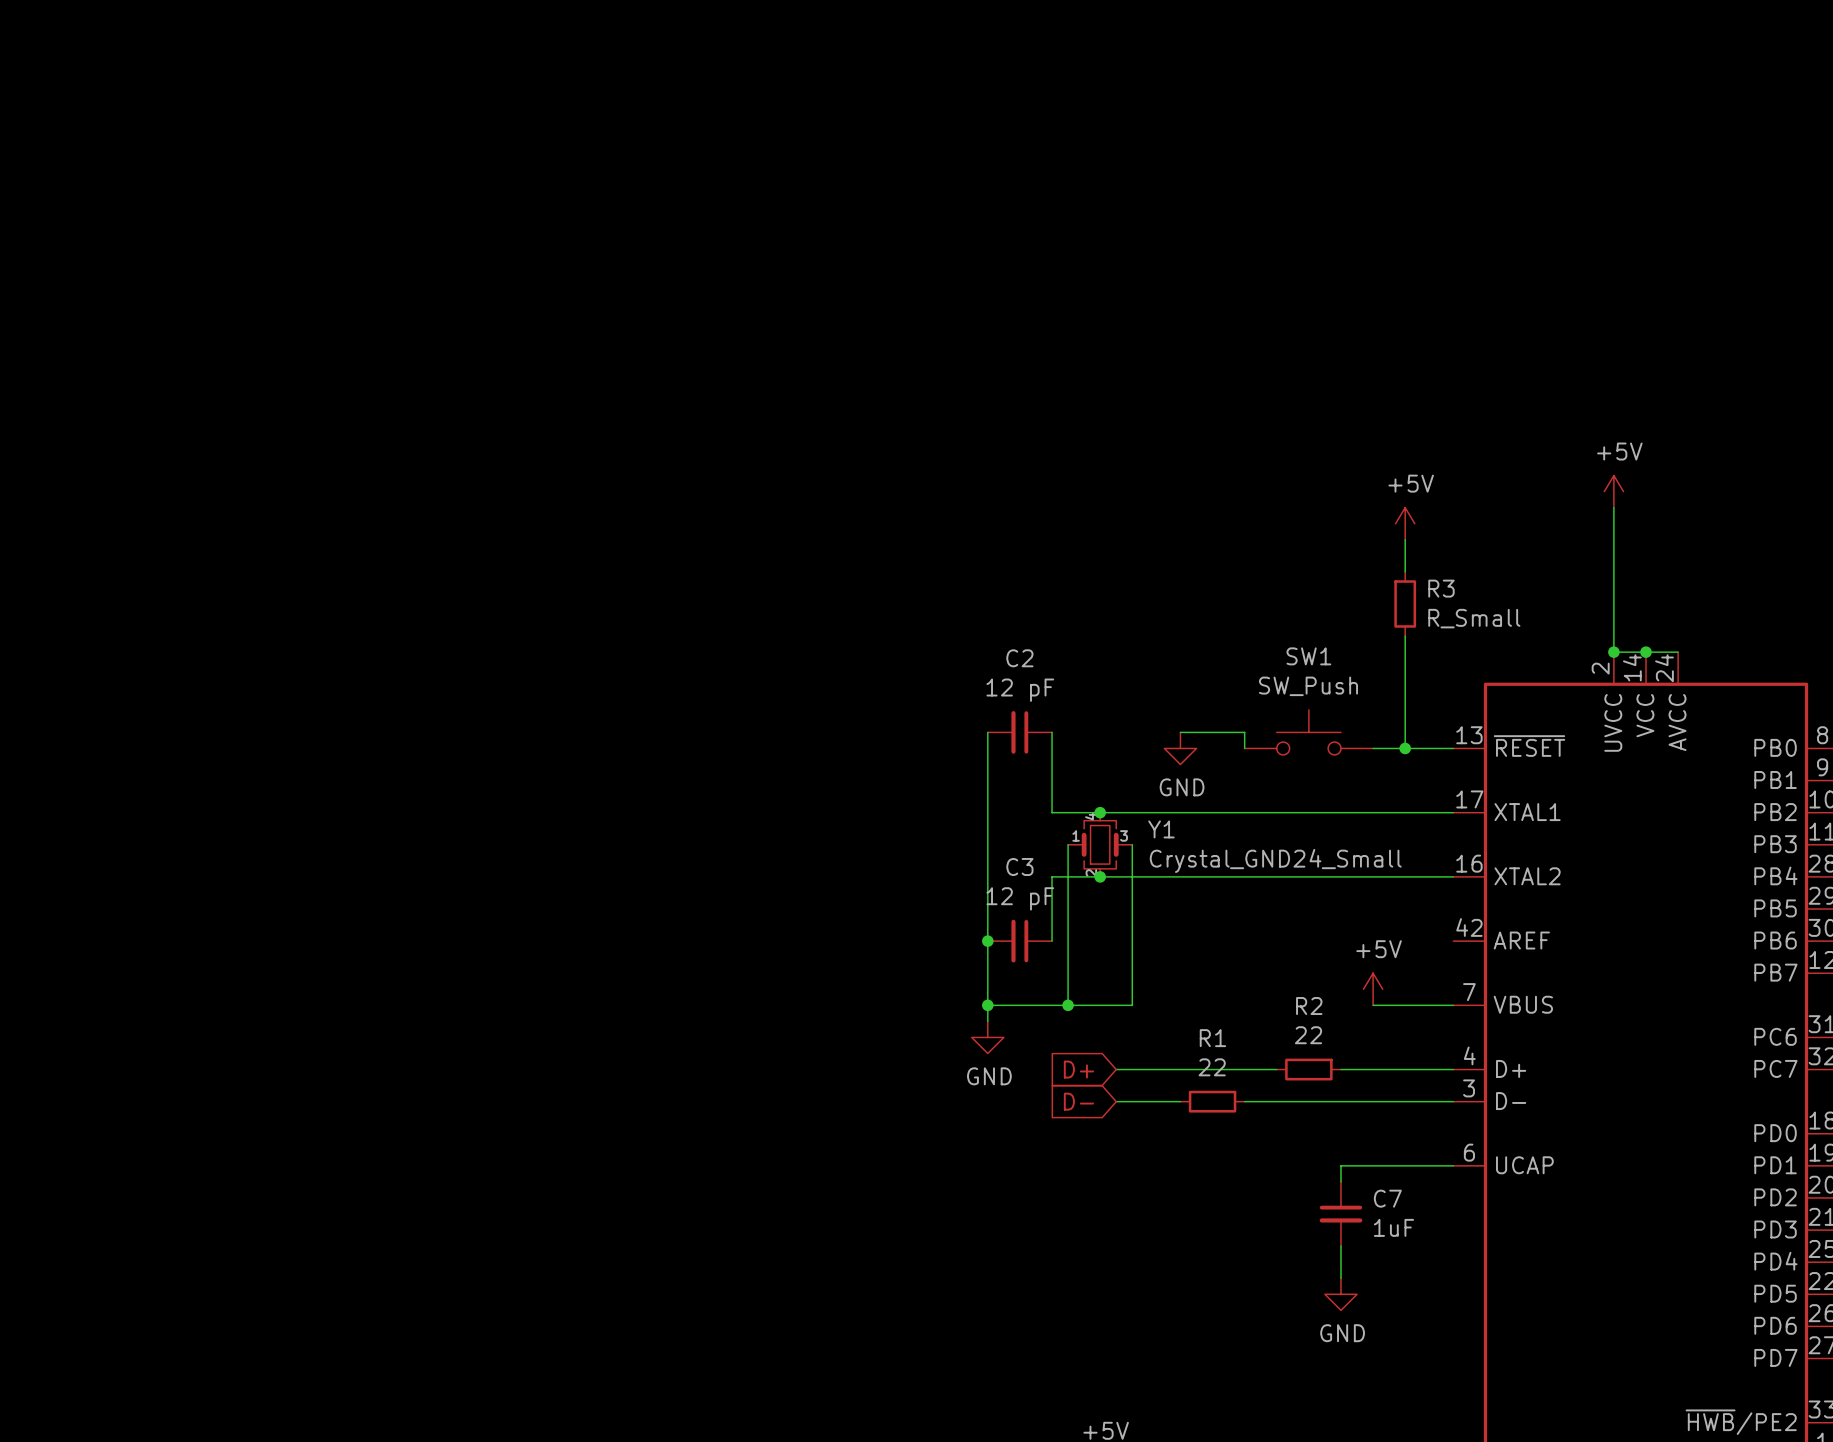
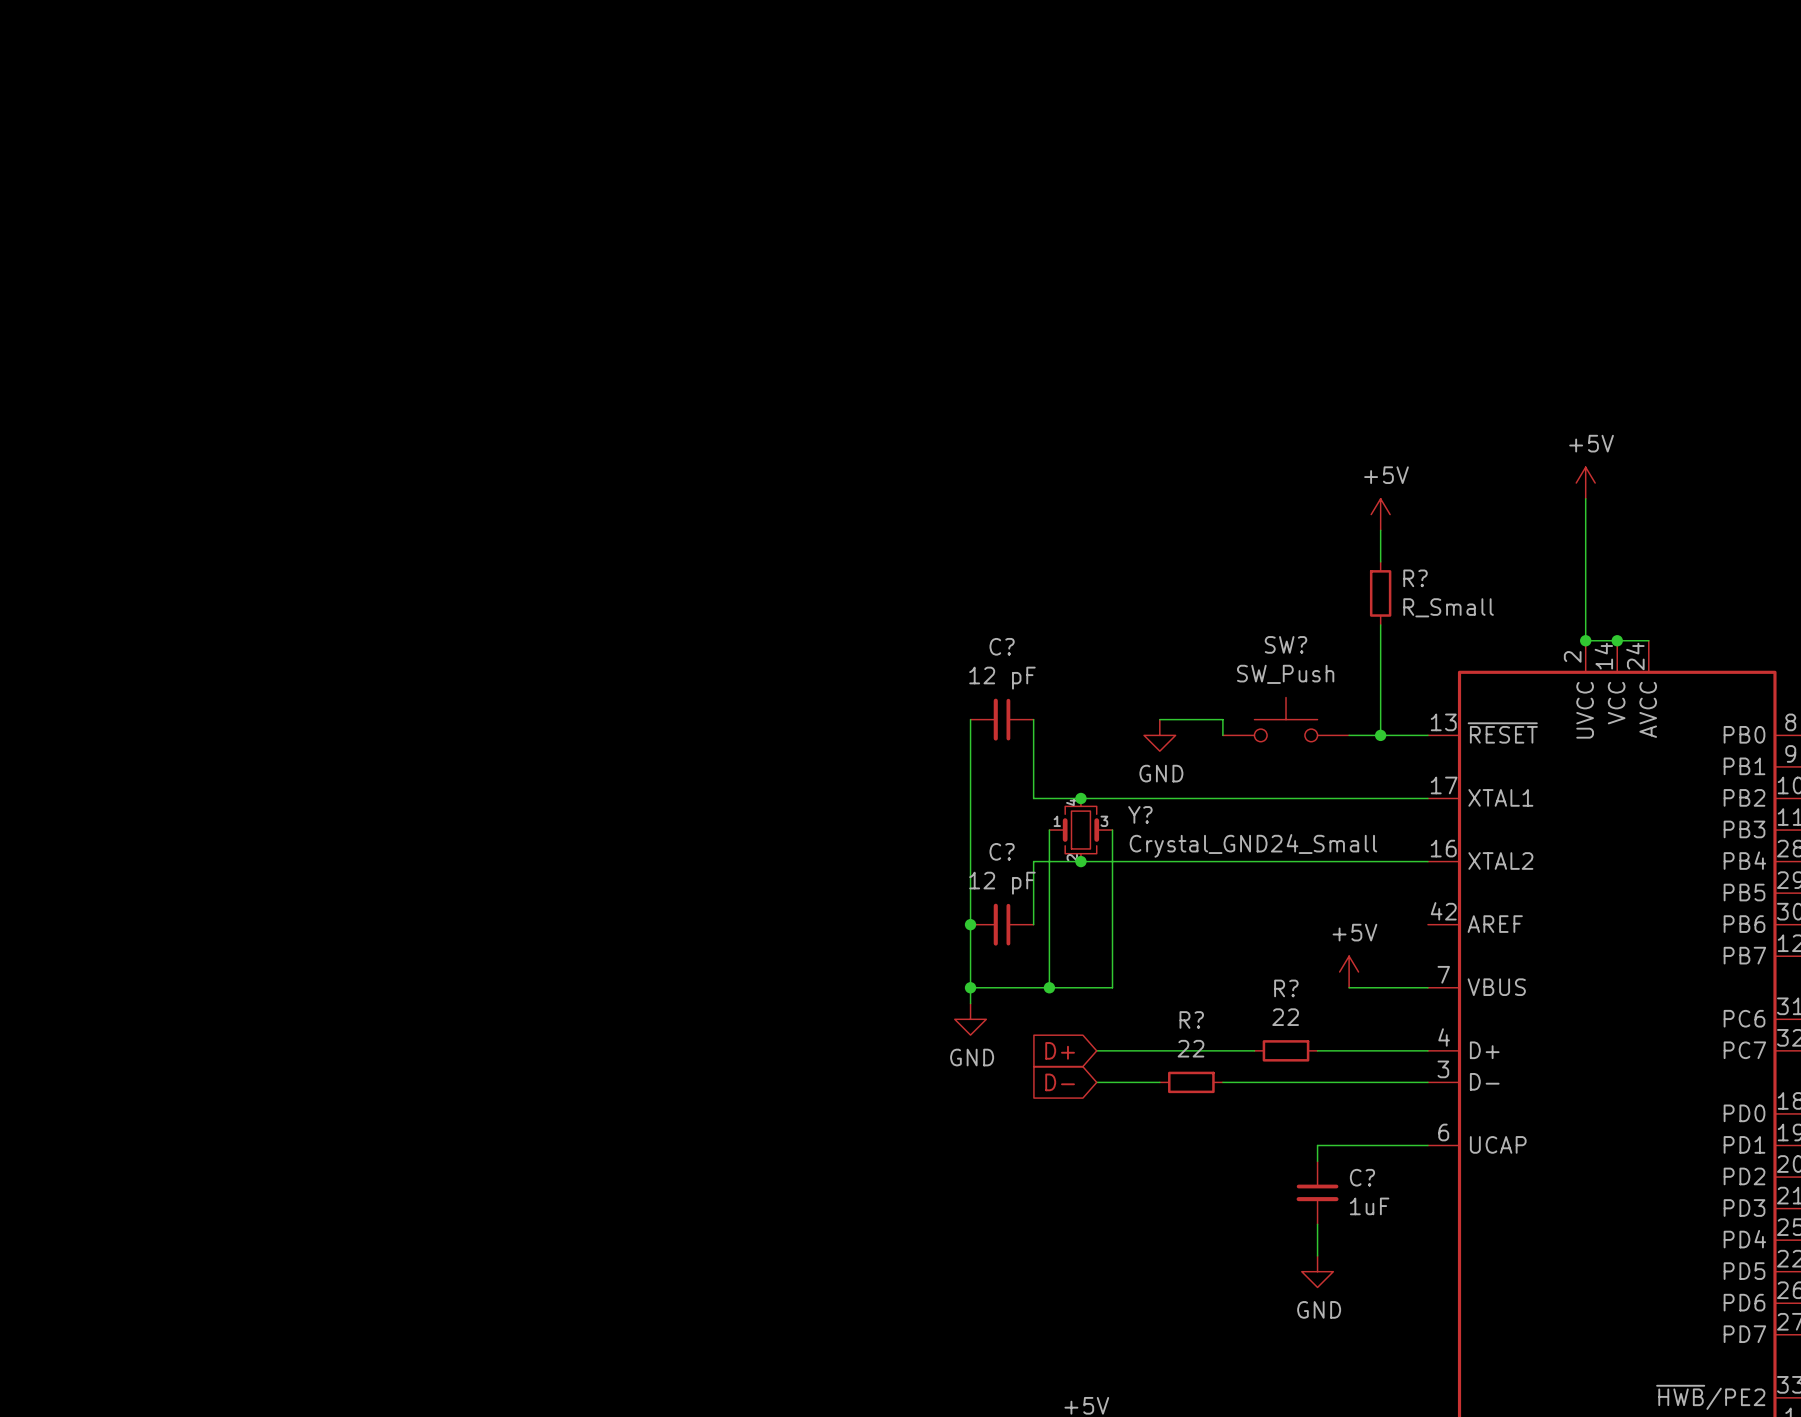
R3 name: R3 (1441, 588) -> R? (1415, 578)
SW1 name: SW1 (1308, 656) -> SW? (1286, 644)
C2 name: C2 (1019, 658) -> C? (1002, 646)
Y1 name: Y1 (1161, 829) -> Y? (1140, 814)
C3 name: C3 (1019, 866) -> C? (1002, 851)
R2 name: R2 (1309, 1006) -> R? (1286, 988)
R1 name: R1 (1212, 1038) -> R? (1191, 1019)
C7 name: C7 (1387, 1198) -> C? (1362, 1177)

